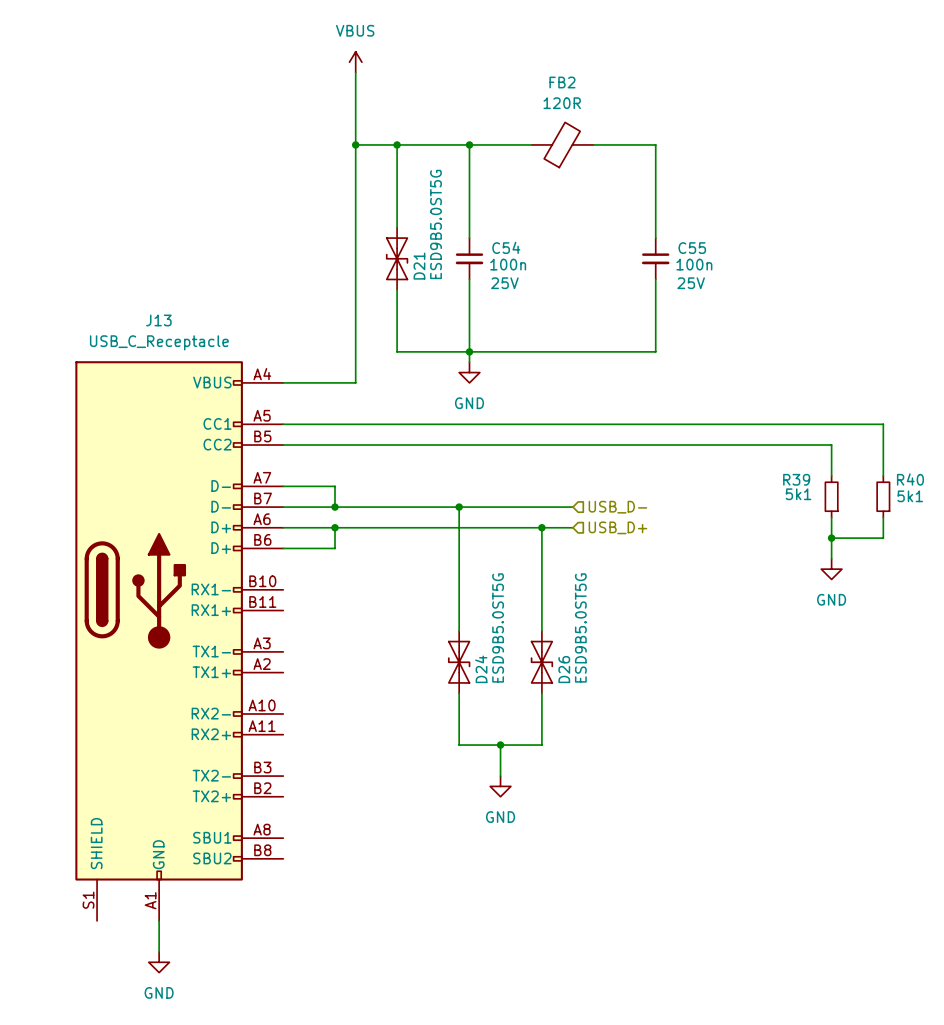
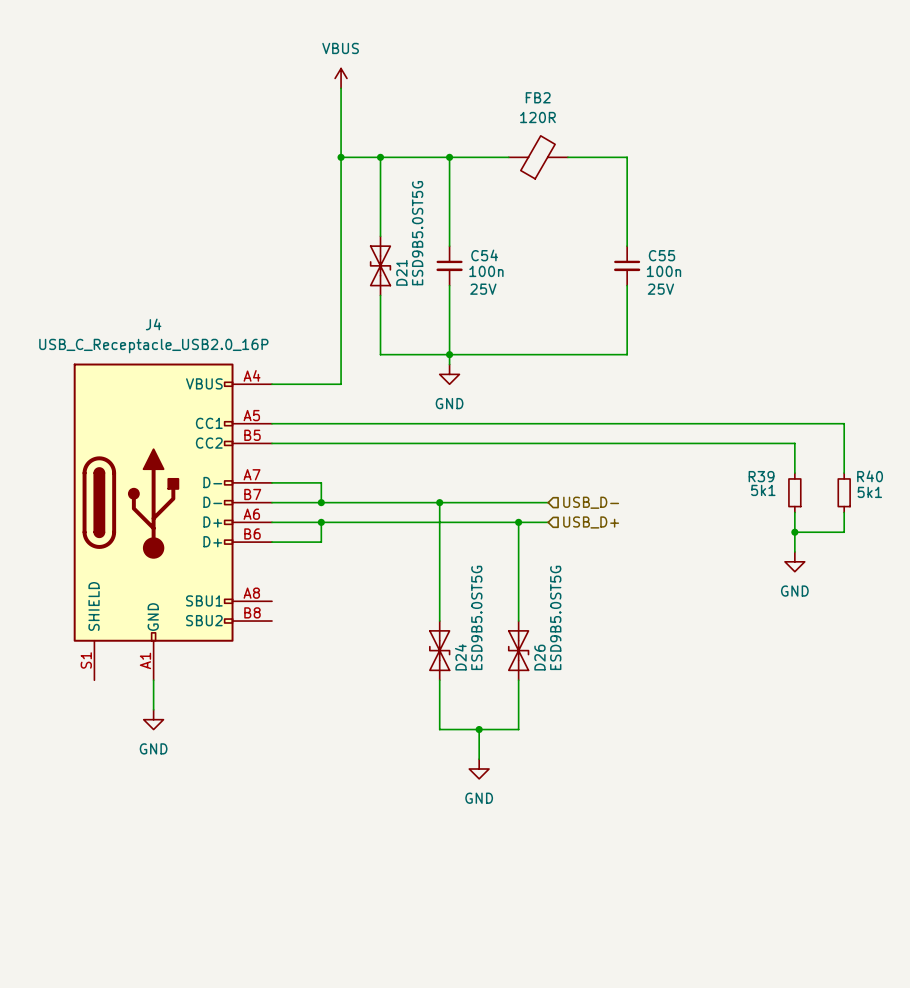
J4: none -> USB_C_Receptacle_USB2.0_16P (172, 521)
J13: USB_C_Receptacle (179, 641) -> none
power symbol: none -> GND (153, 719)
wire: (159, 920) (159, 951) -> none
power symbol: GND (159, 962) -> none

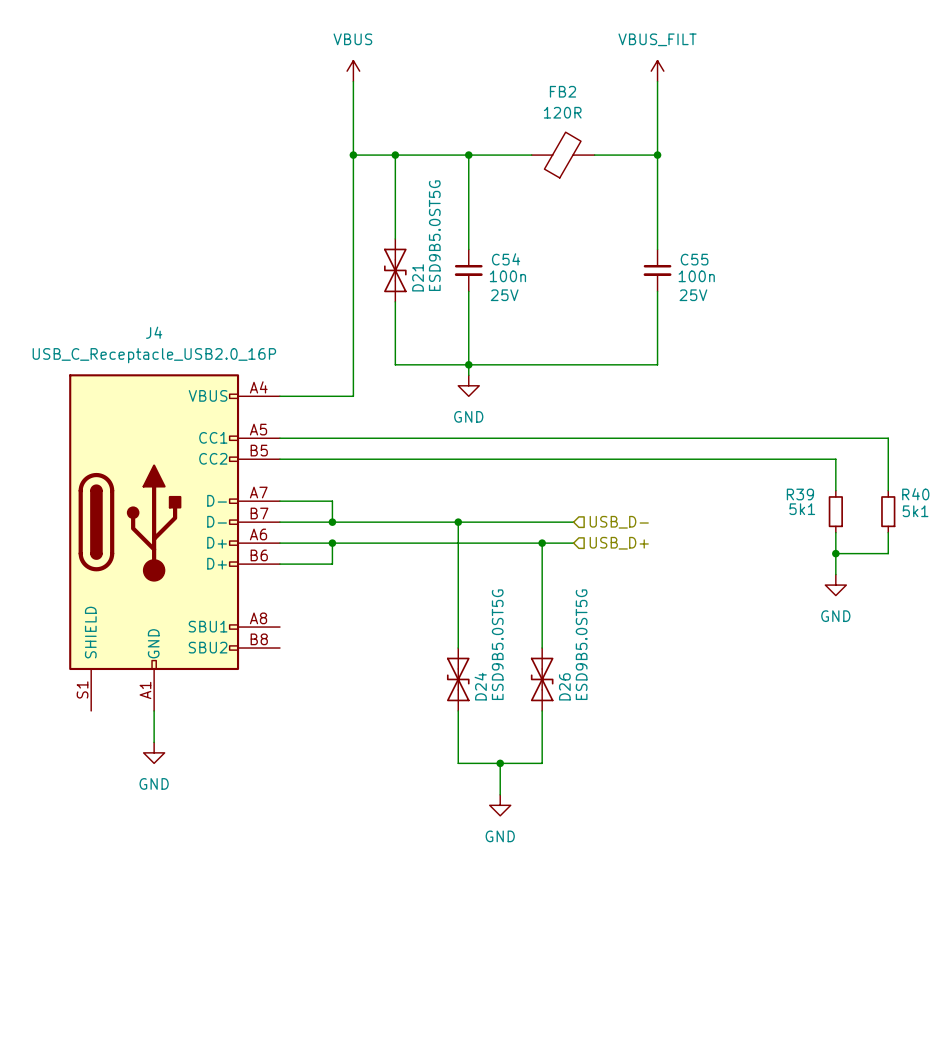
power symbol: none -> VBUS_FILT (657, 71)
wire: none -> (657, 81) (657, 155)
junction: none -> (657, 155)

